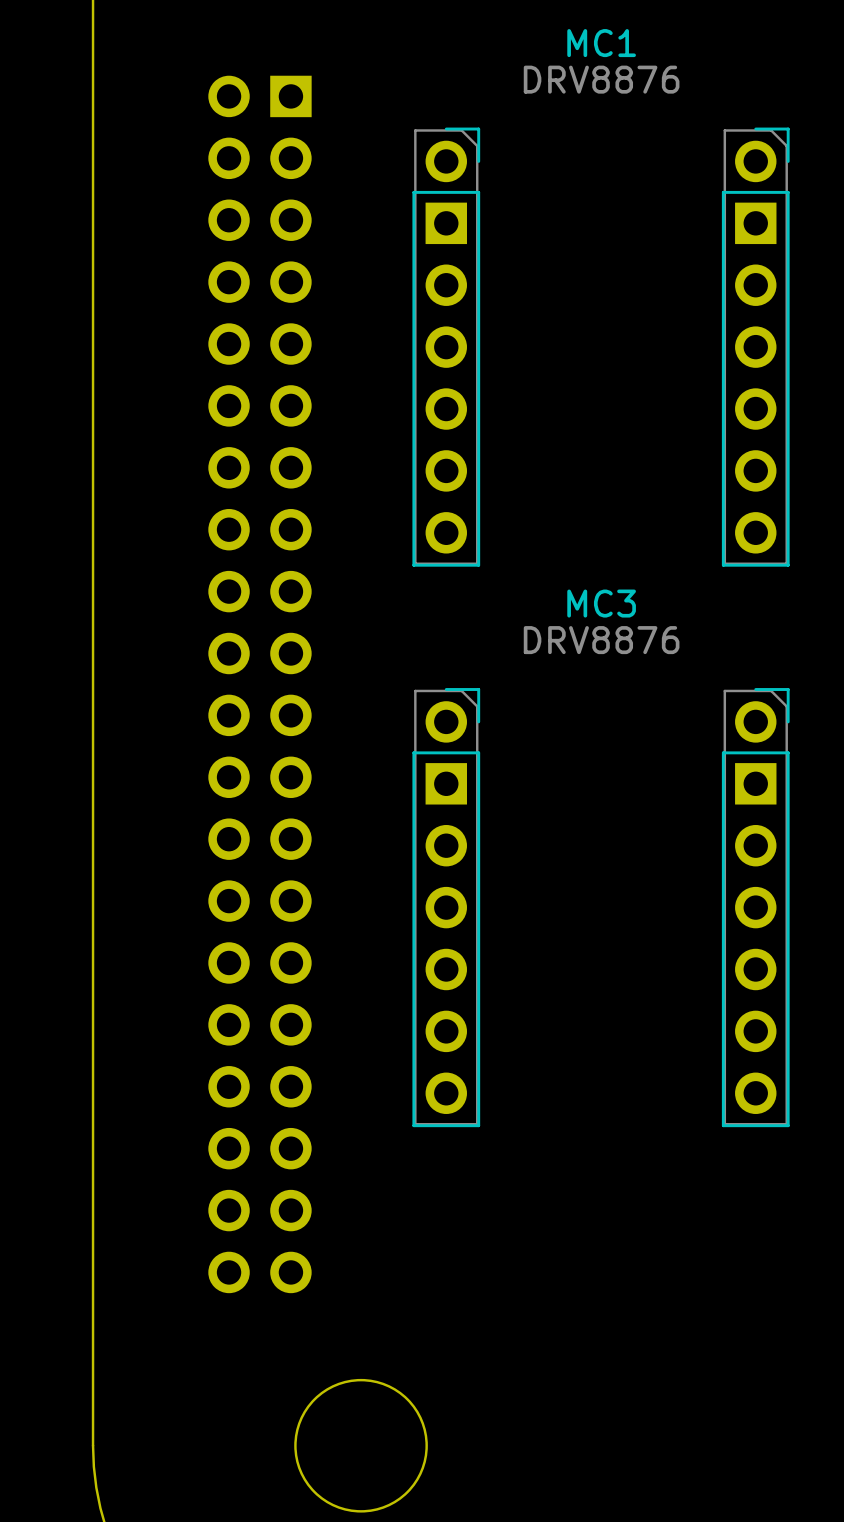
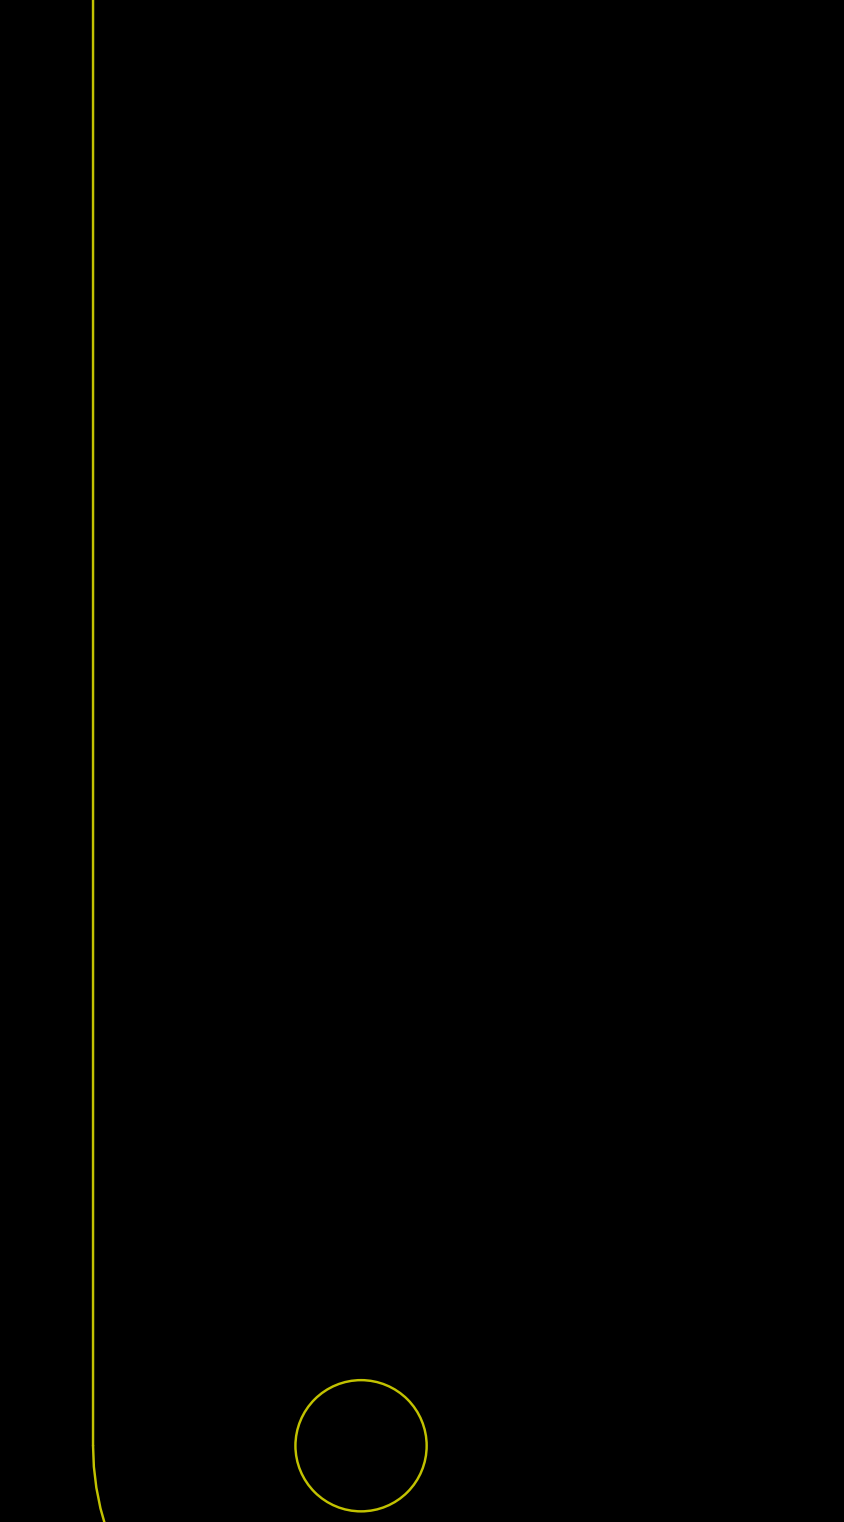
MC1: DRV8876 (601, 347) -> none
part: (259, 684) -> none
MC3: DRV8876 (601, 907) -> none

